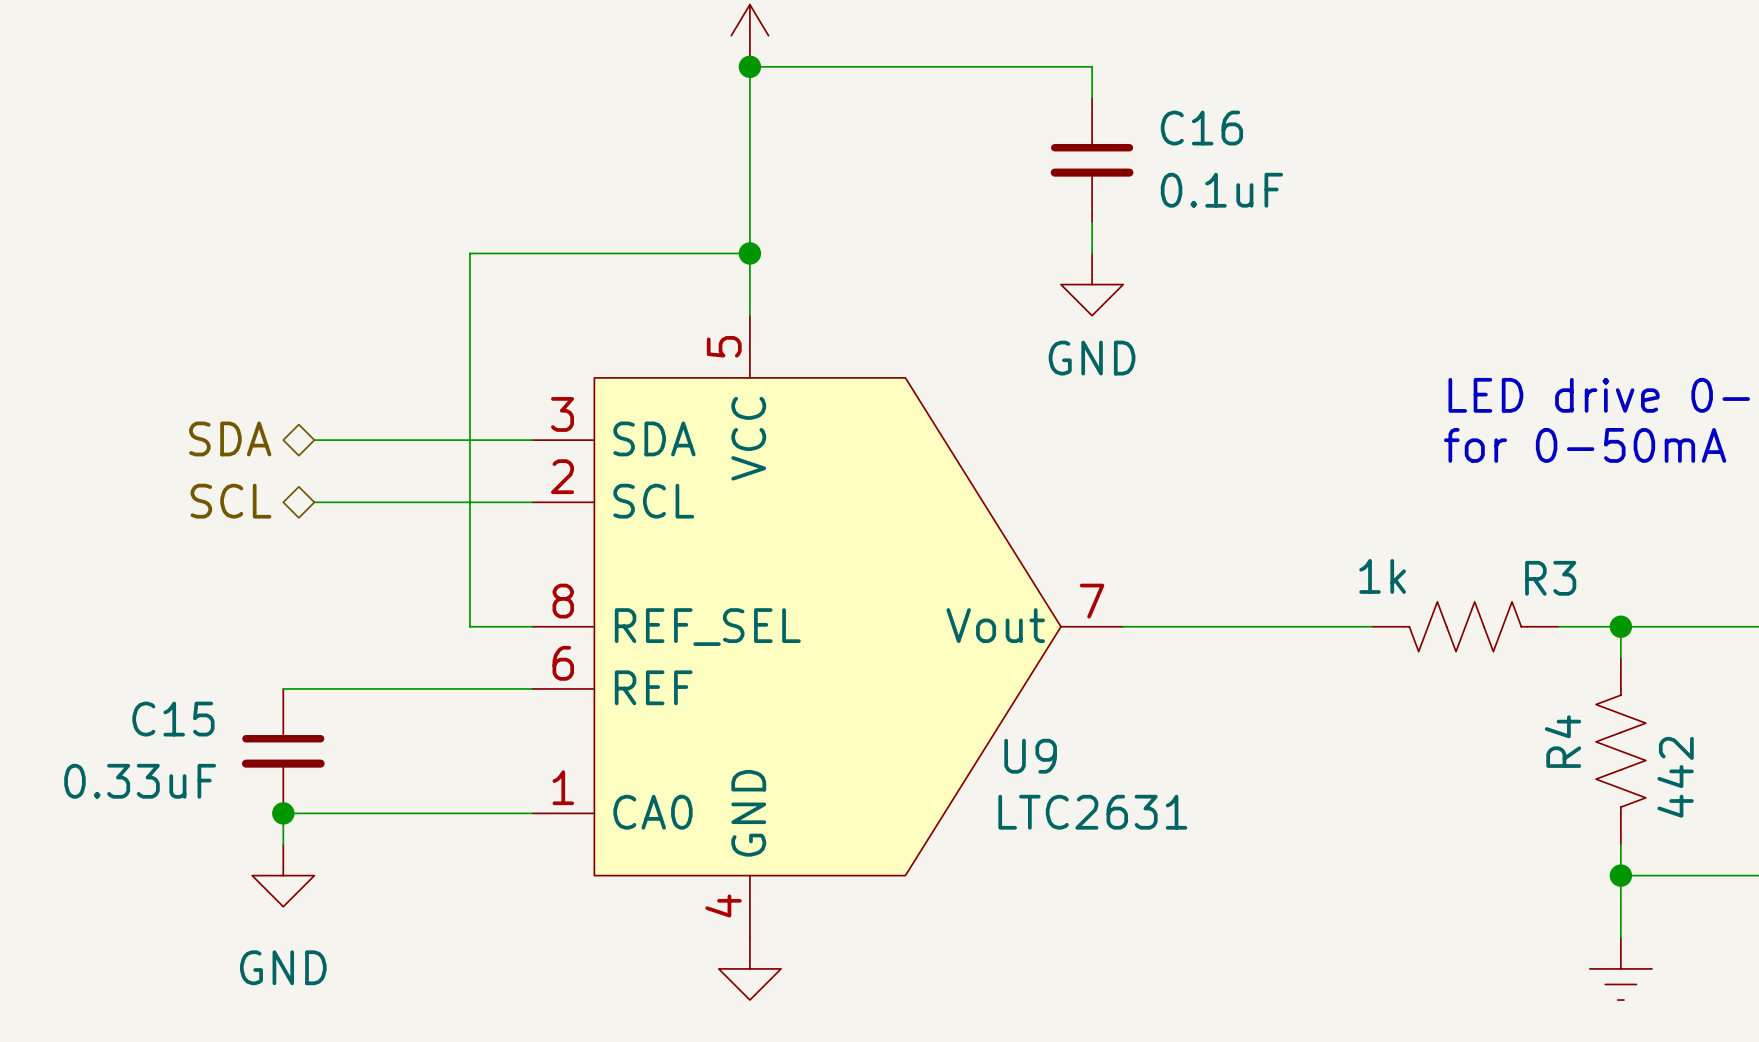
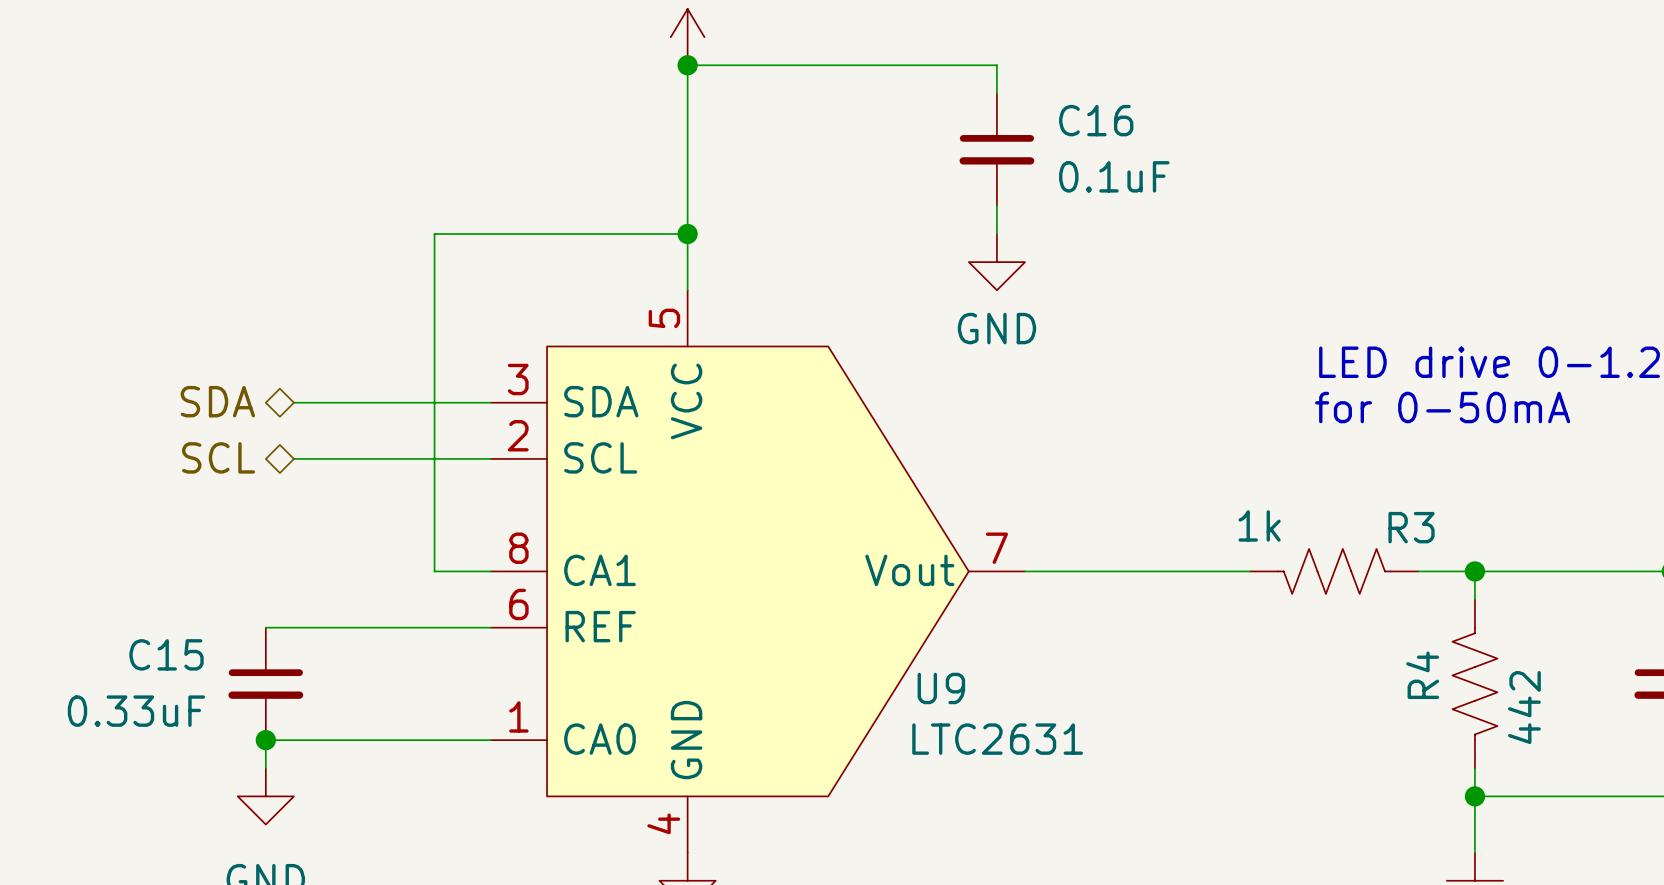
U9 pin name: REF_SEL (707, 627) -> CA1 (599, 570)

